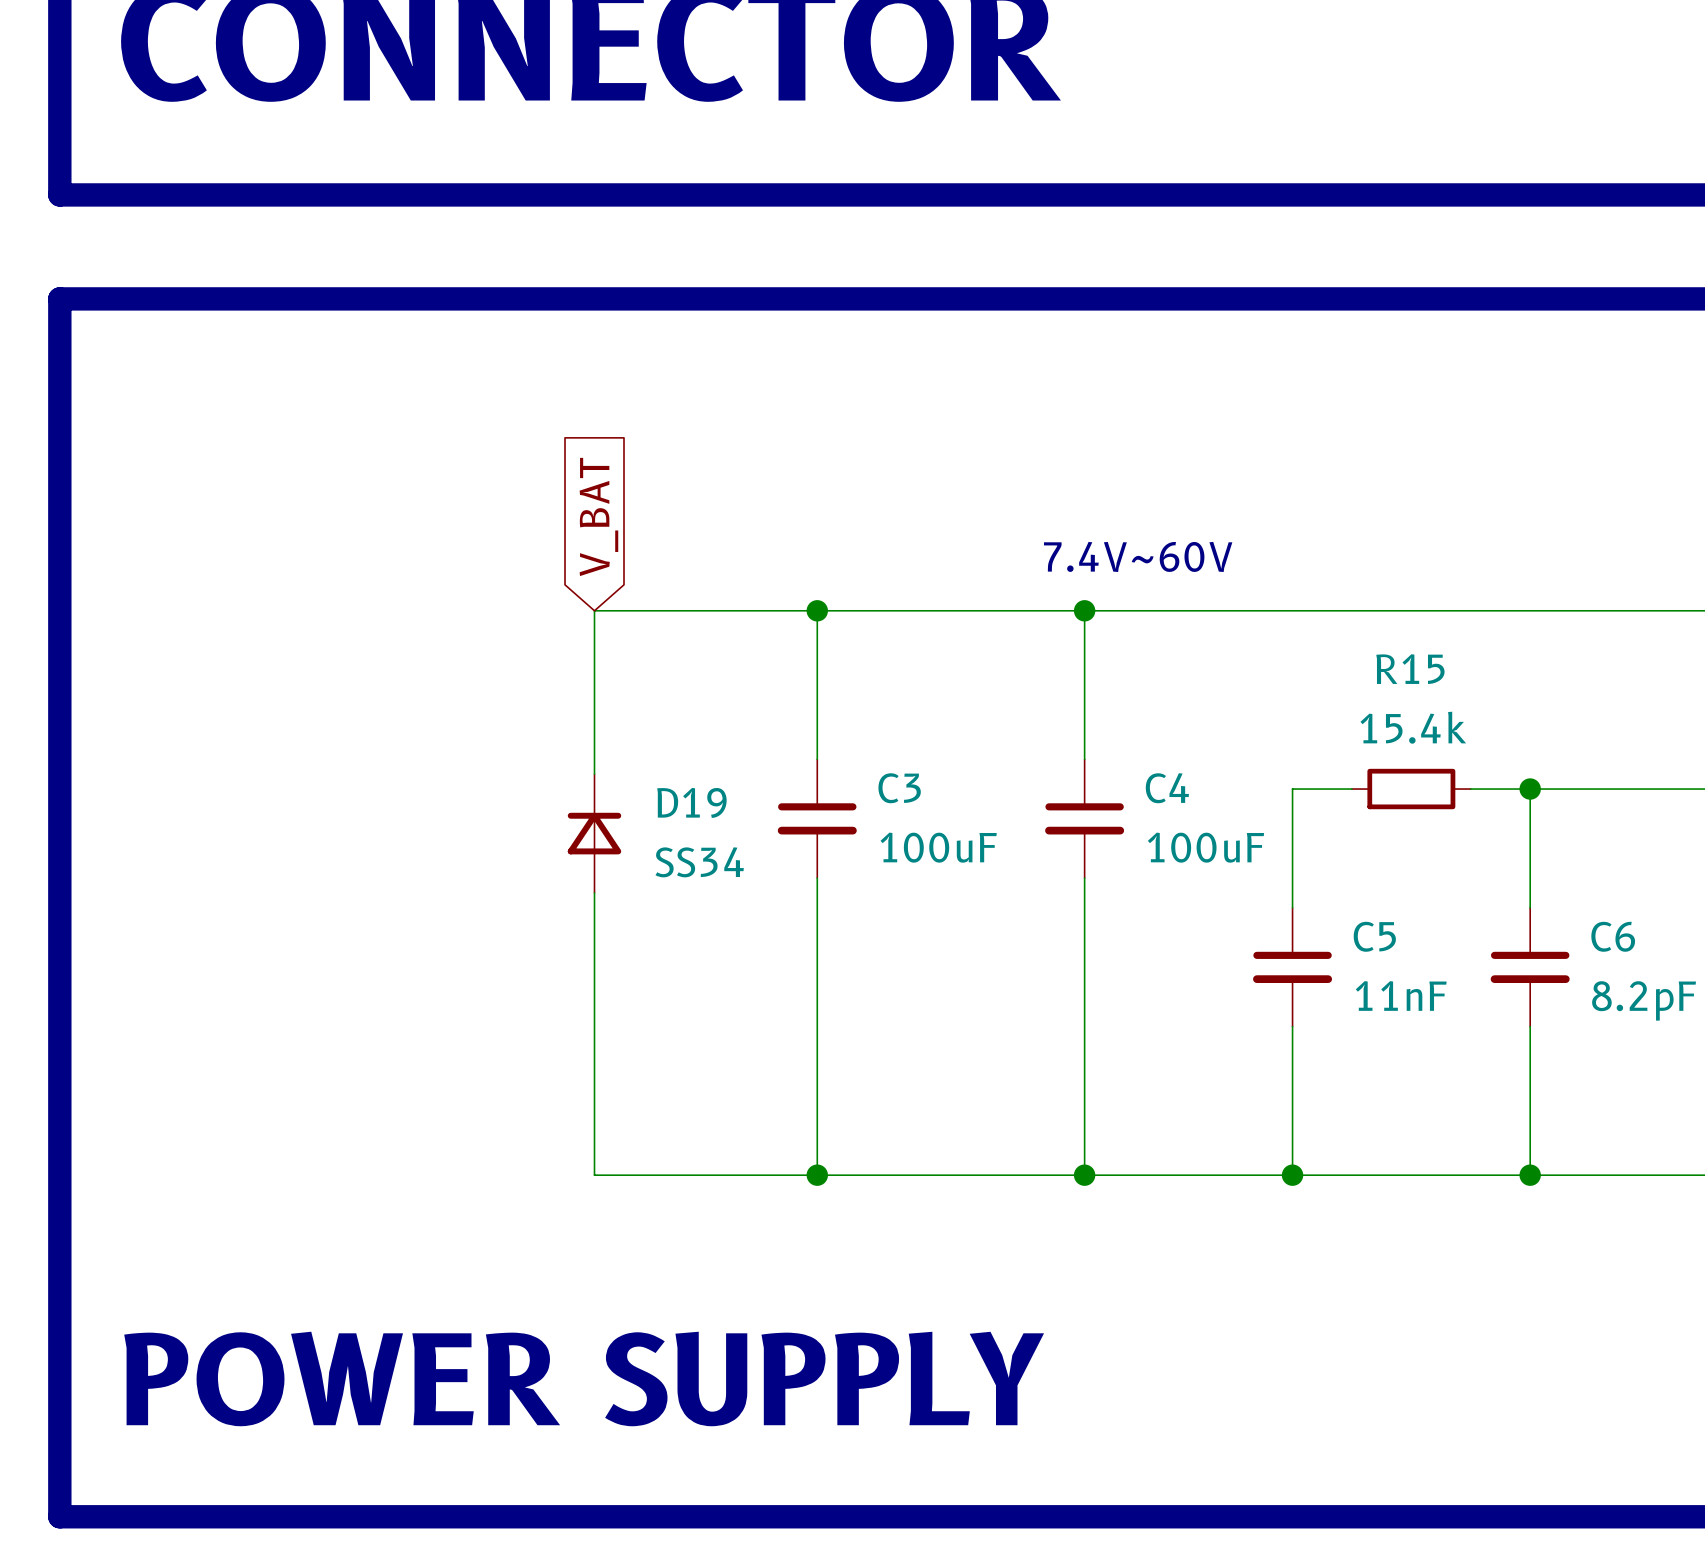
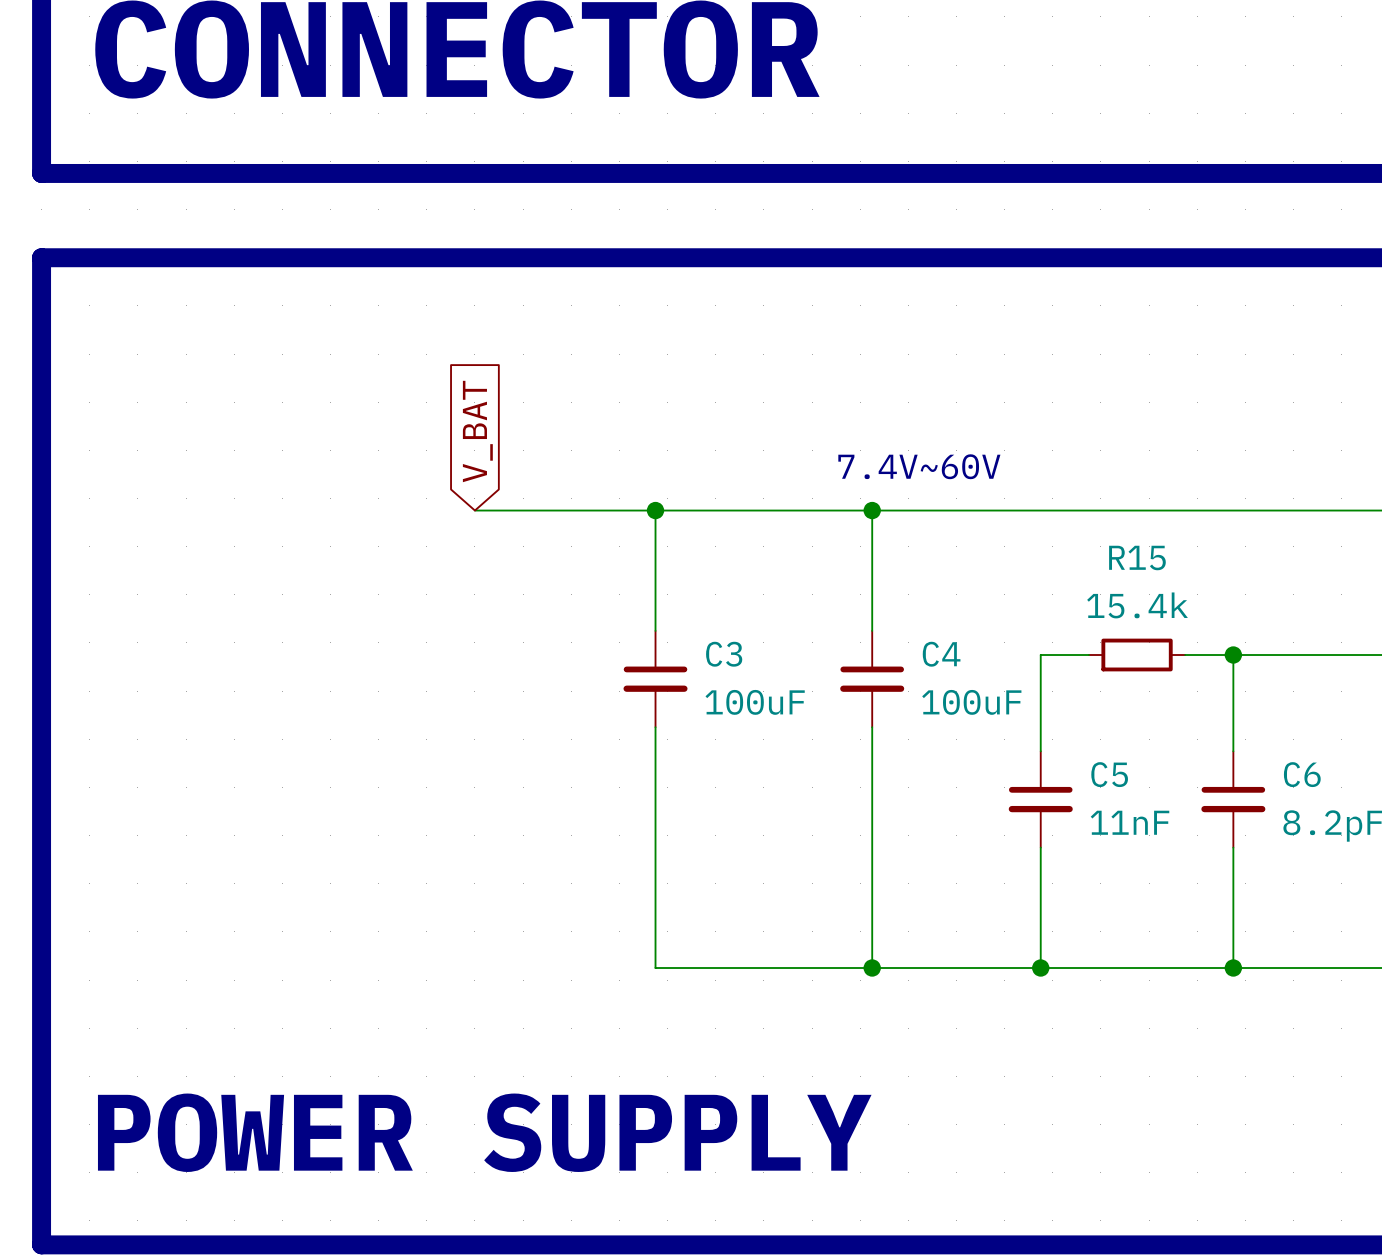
wire: (594, 610) (594, 774) -> none
D19: SS34 (594, 833) -> none
wire: (594, 892) (594, 1175) (817, 1175) -> none
junction: (817, 1175) -> none

